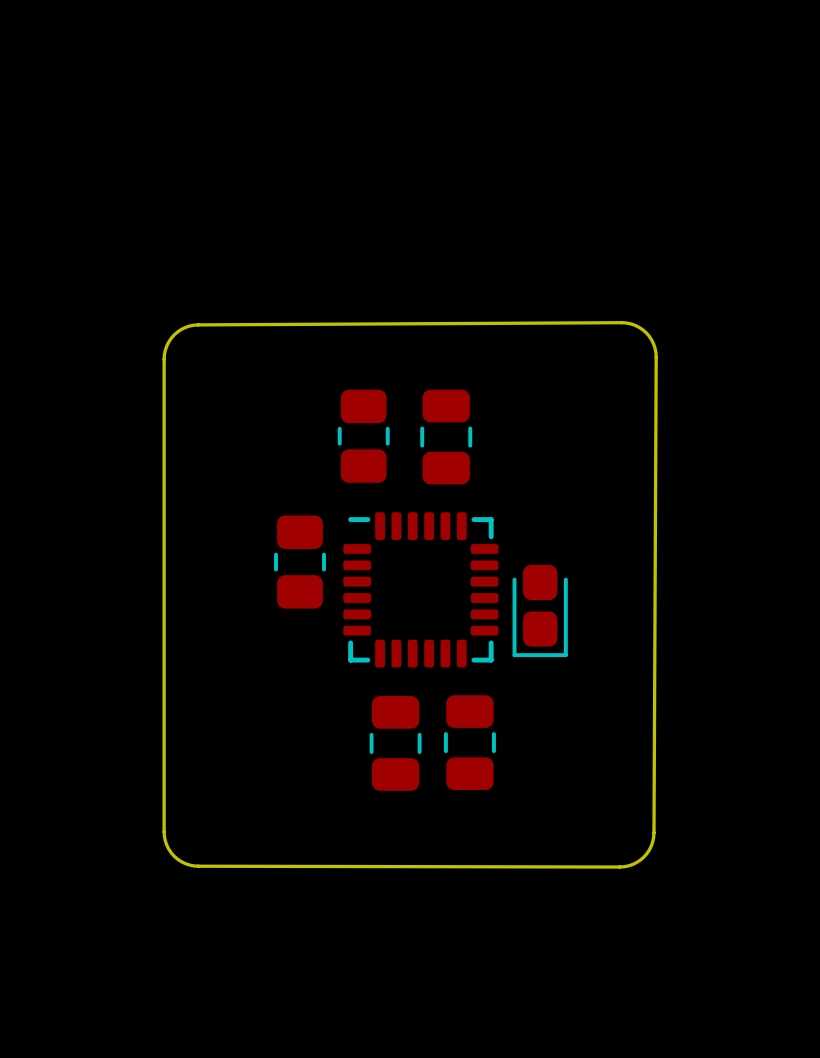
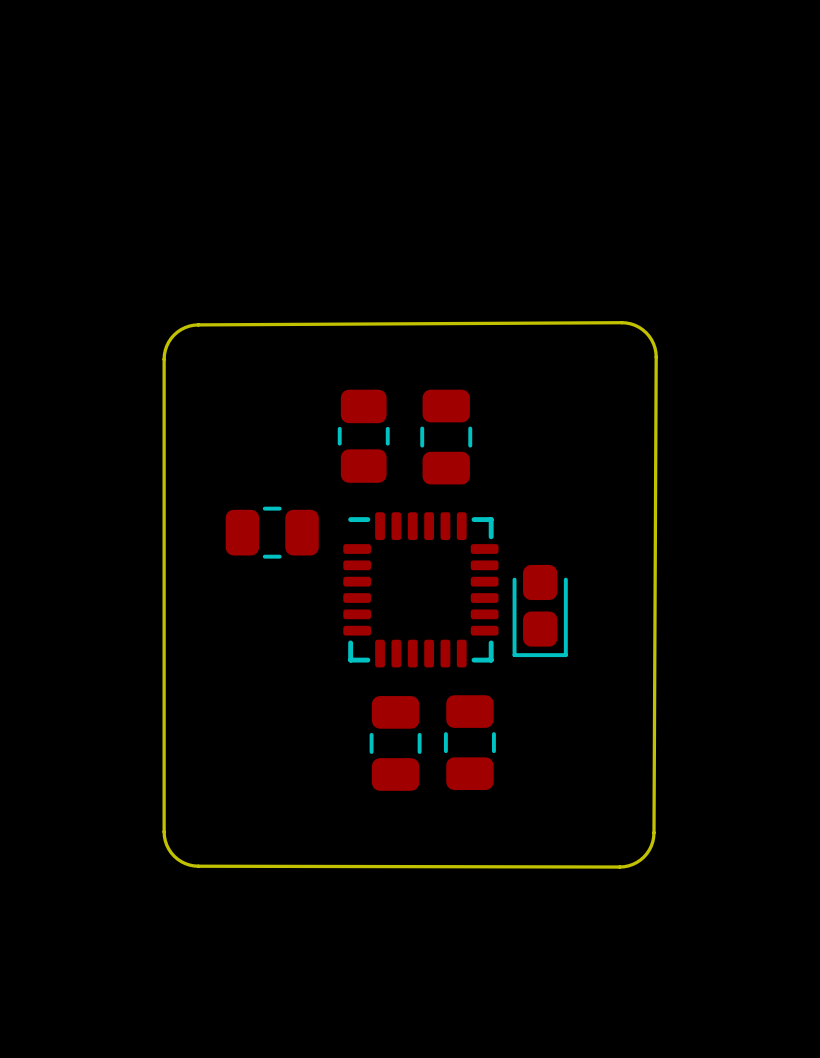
part rotation: 0° (299, 562) -> 90° clockwise (272, 532)

